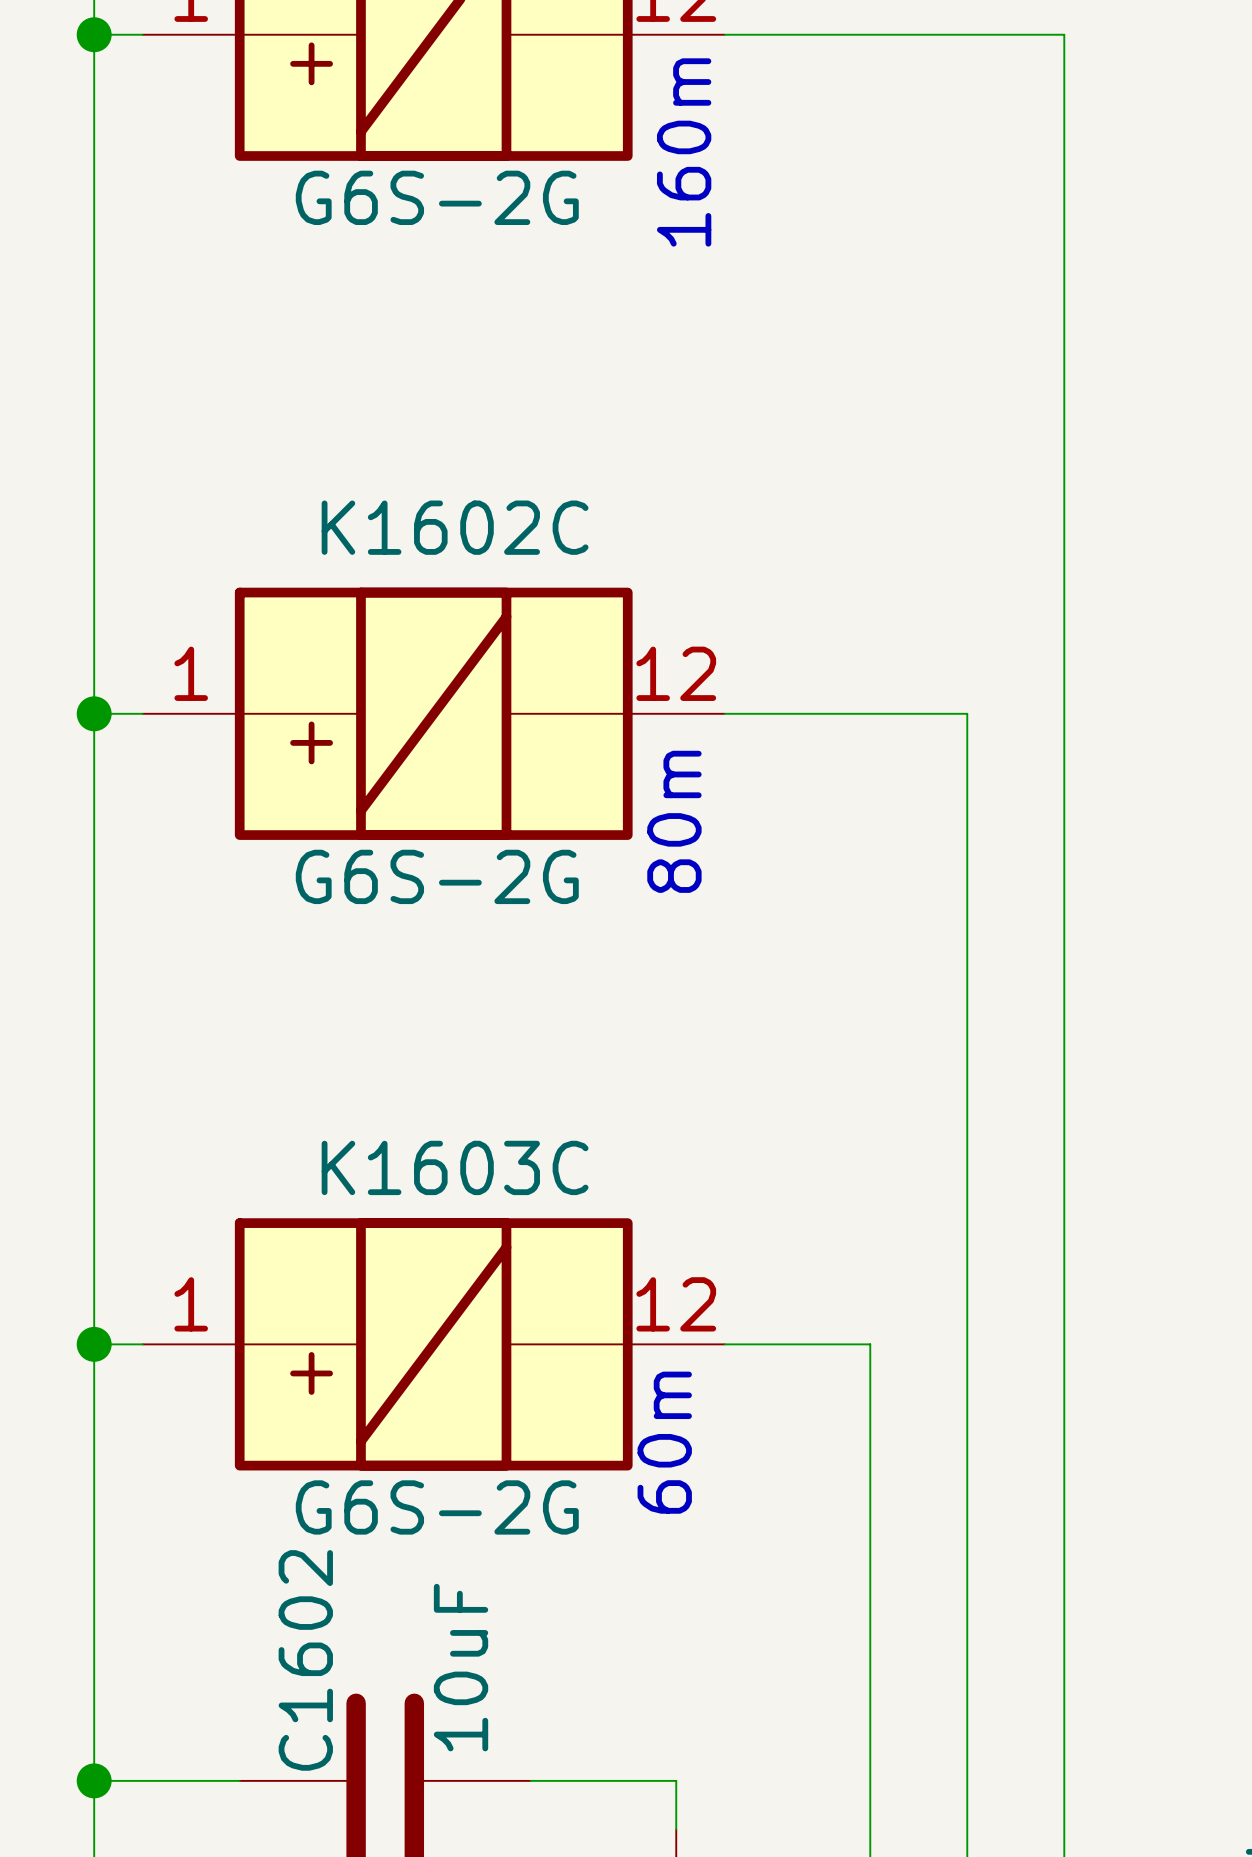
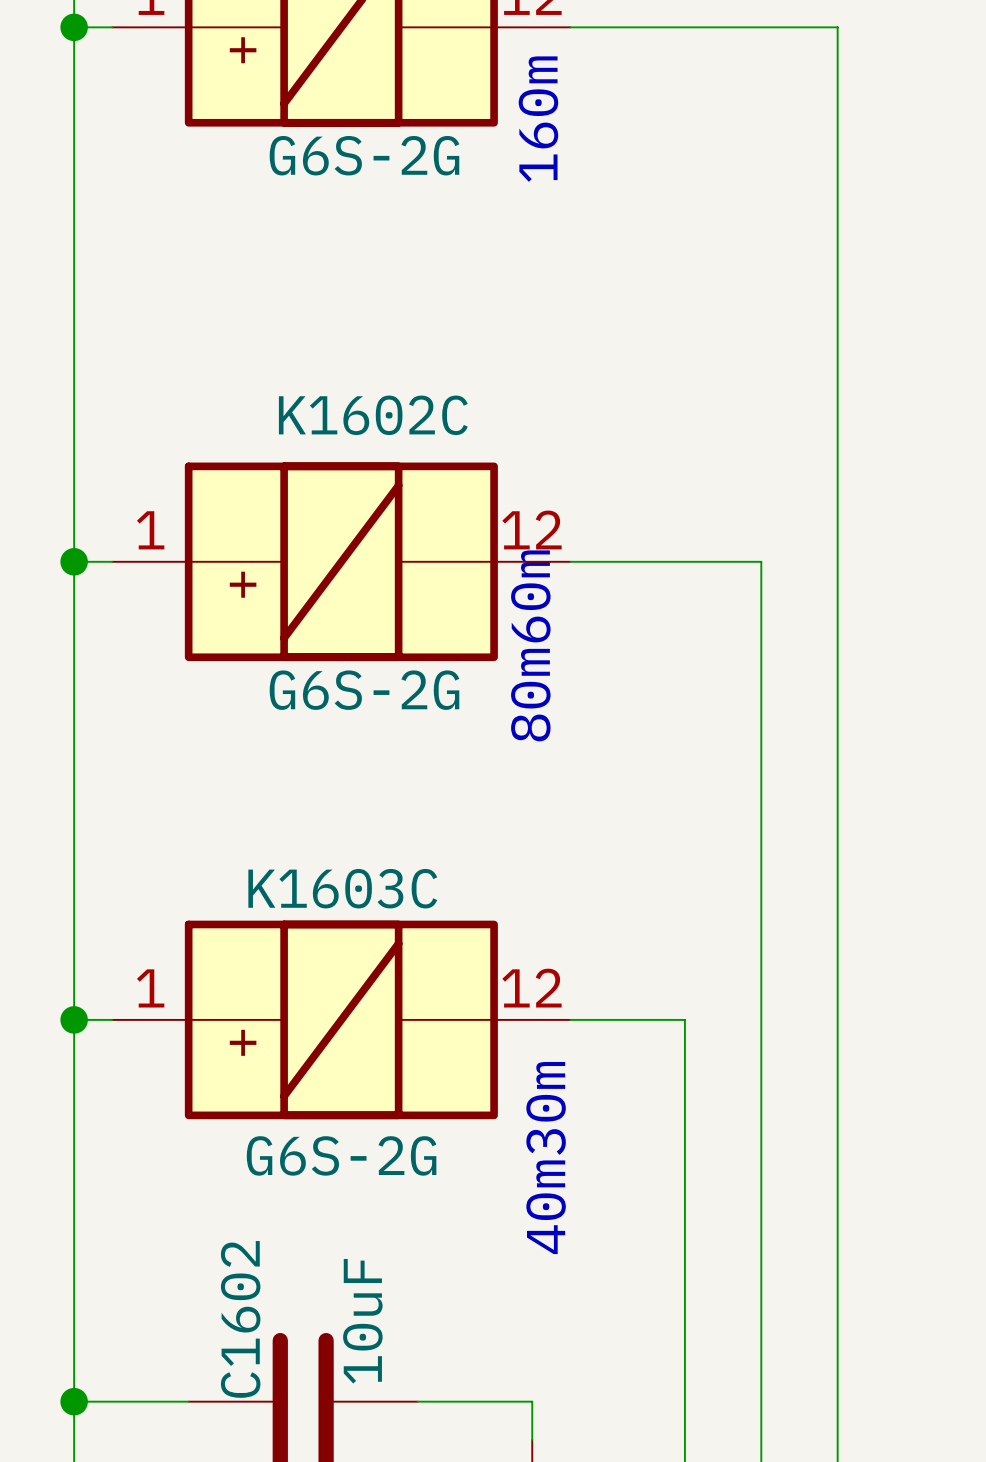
text: 80m (674, 821) -> 80m60m (530, 645)
K1603C name position: K1603C (455, 1167) -> K1603C (342, 888)
wire: (94, 1344) (142, 1344) -> (74, 1019) (112, 1019)
junction position: (94, 1344) -> (74, 1019)
K1603C position: (433, 1344) -> (341, 1019)
wire: (724, 1344) (870, 1344) -> (570, 1019) (684, 1019) (684, 1058)
text: 60m (664, 1442) -> none
text: none -> 40m30m (546, 1158)
K1603C value position: G6S-2G (437, 1507) -> G6S-2G (341, 1155)

